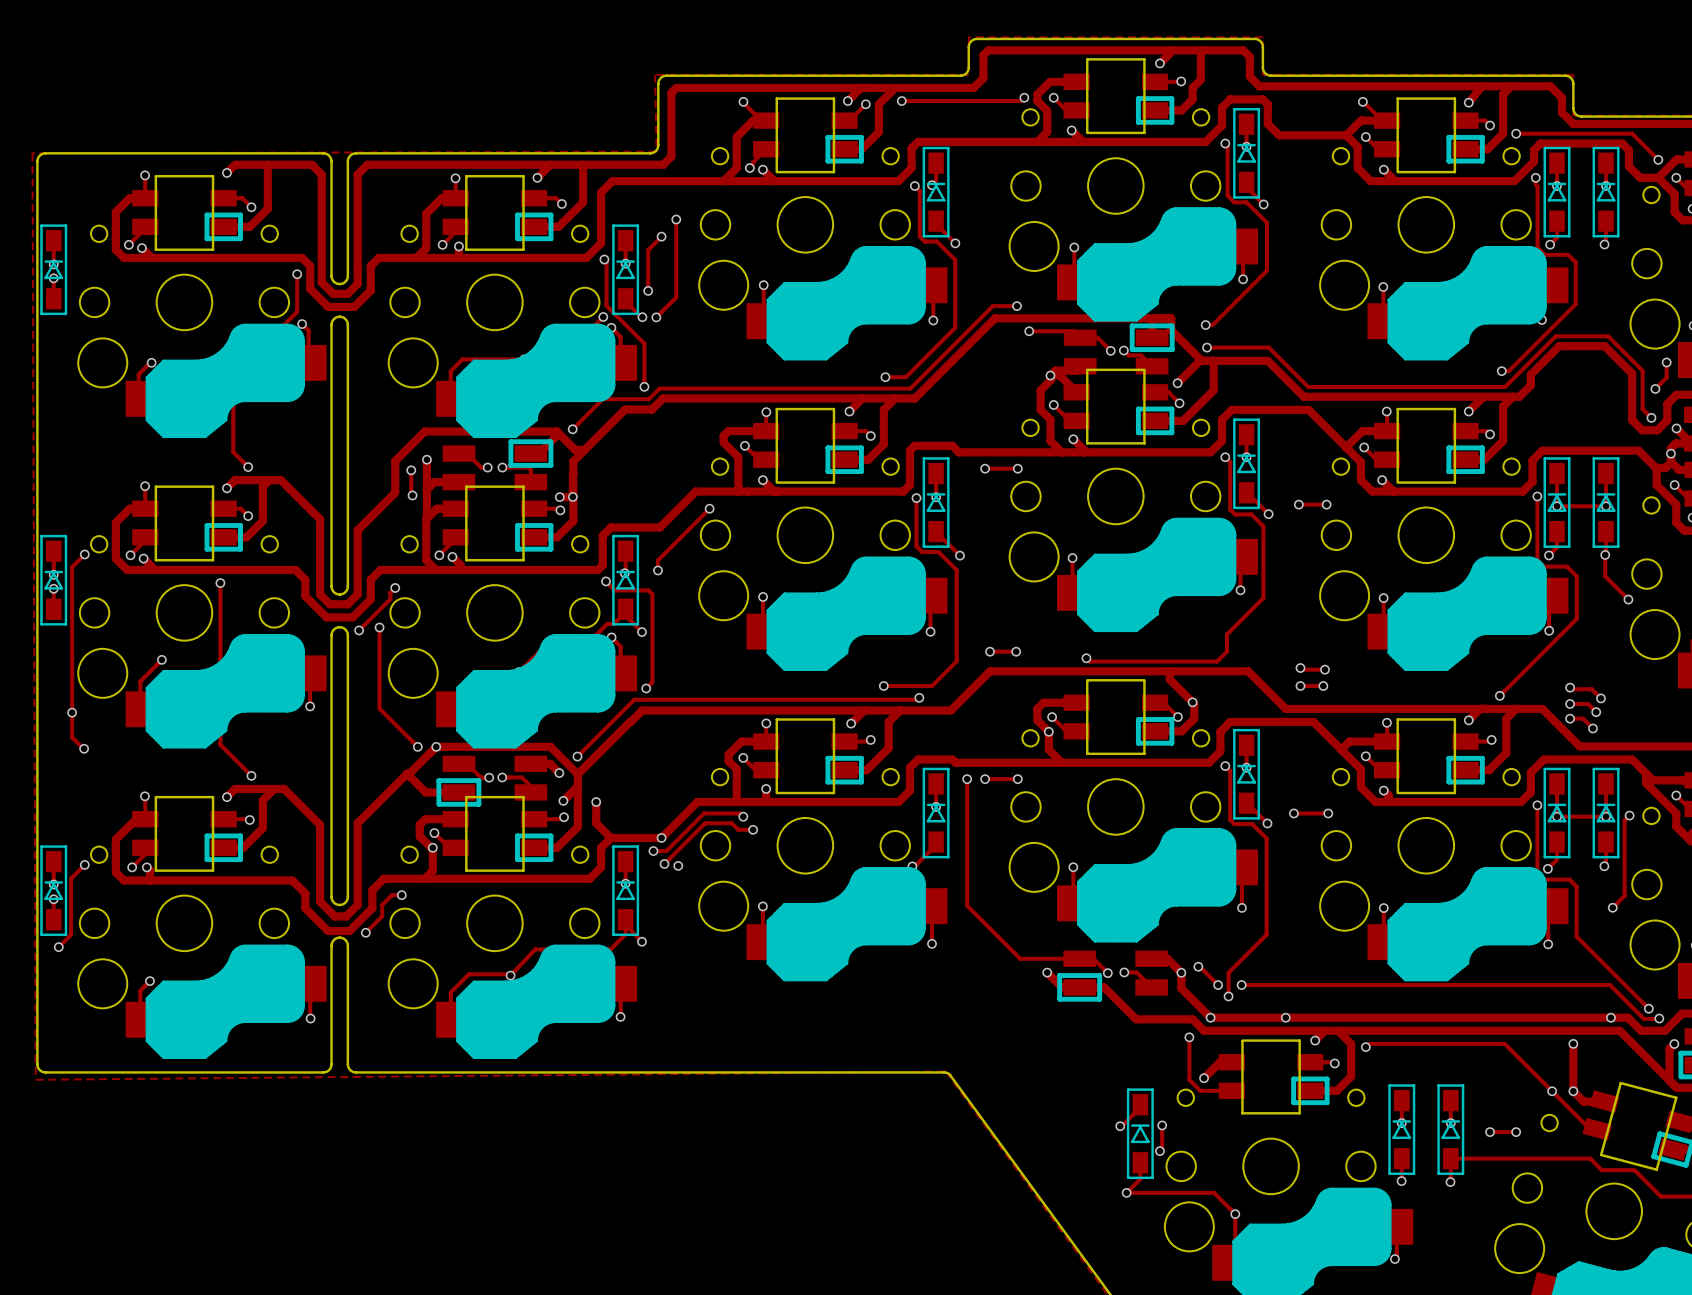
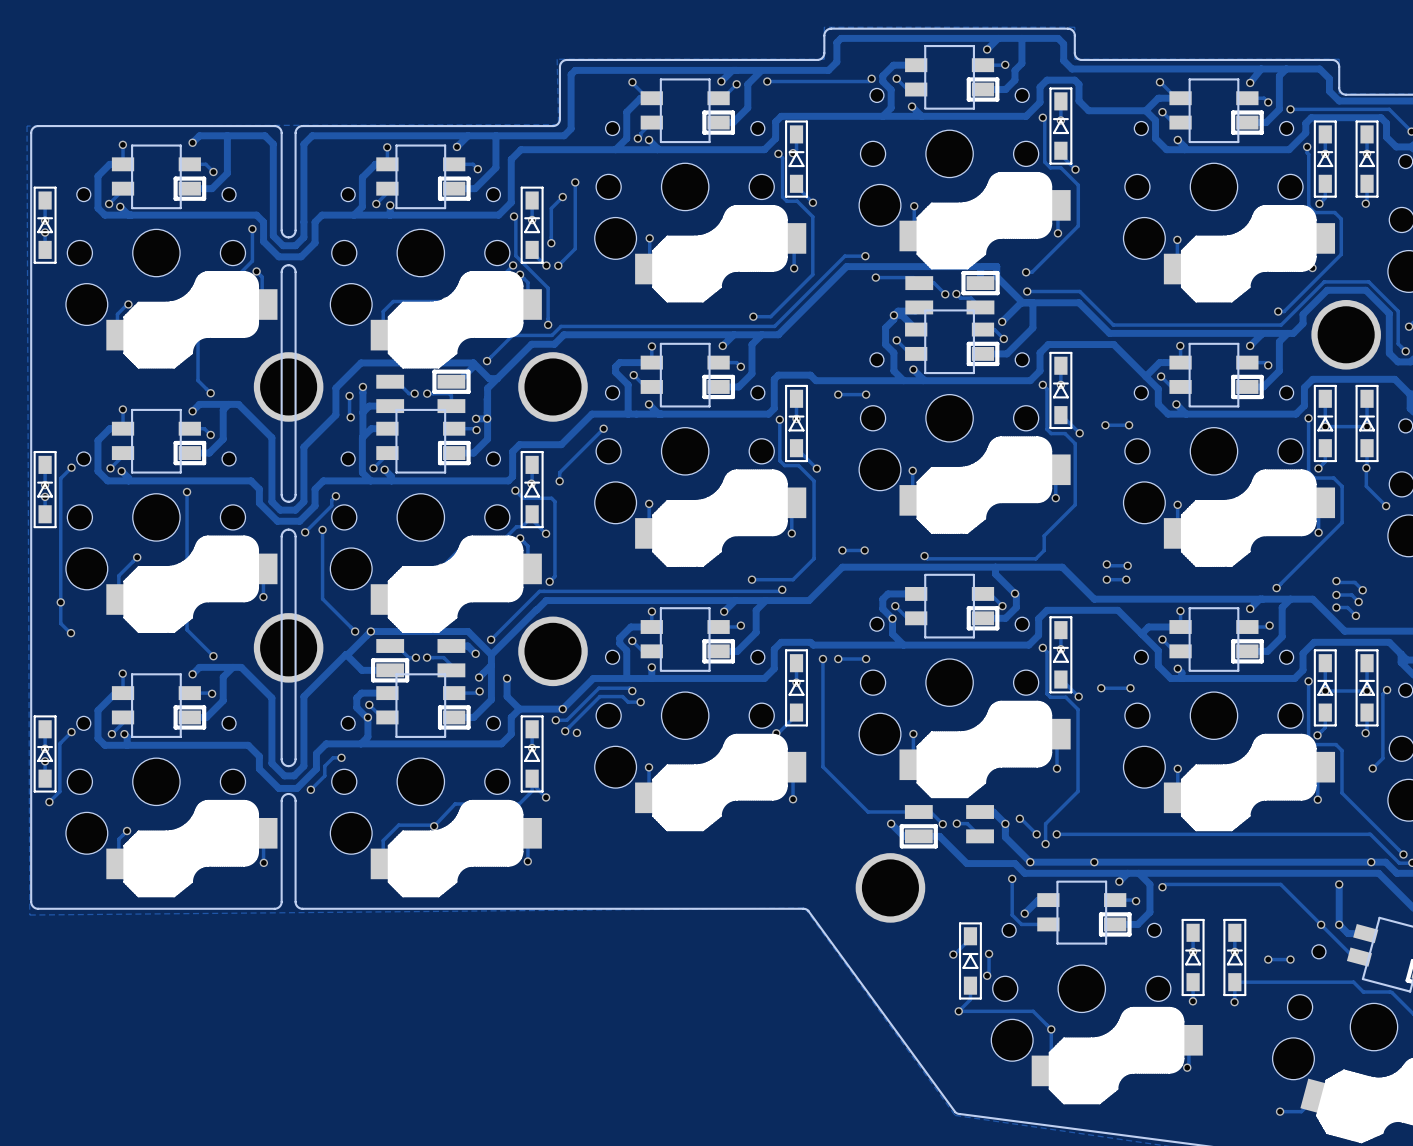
part: none -> (1346, 334)
part: none -> (288, 386)
part: none -> (553, 386)
part: none -> (288, 647)
part: none -> (553, 651)
part: none -> (890, 887)

